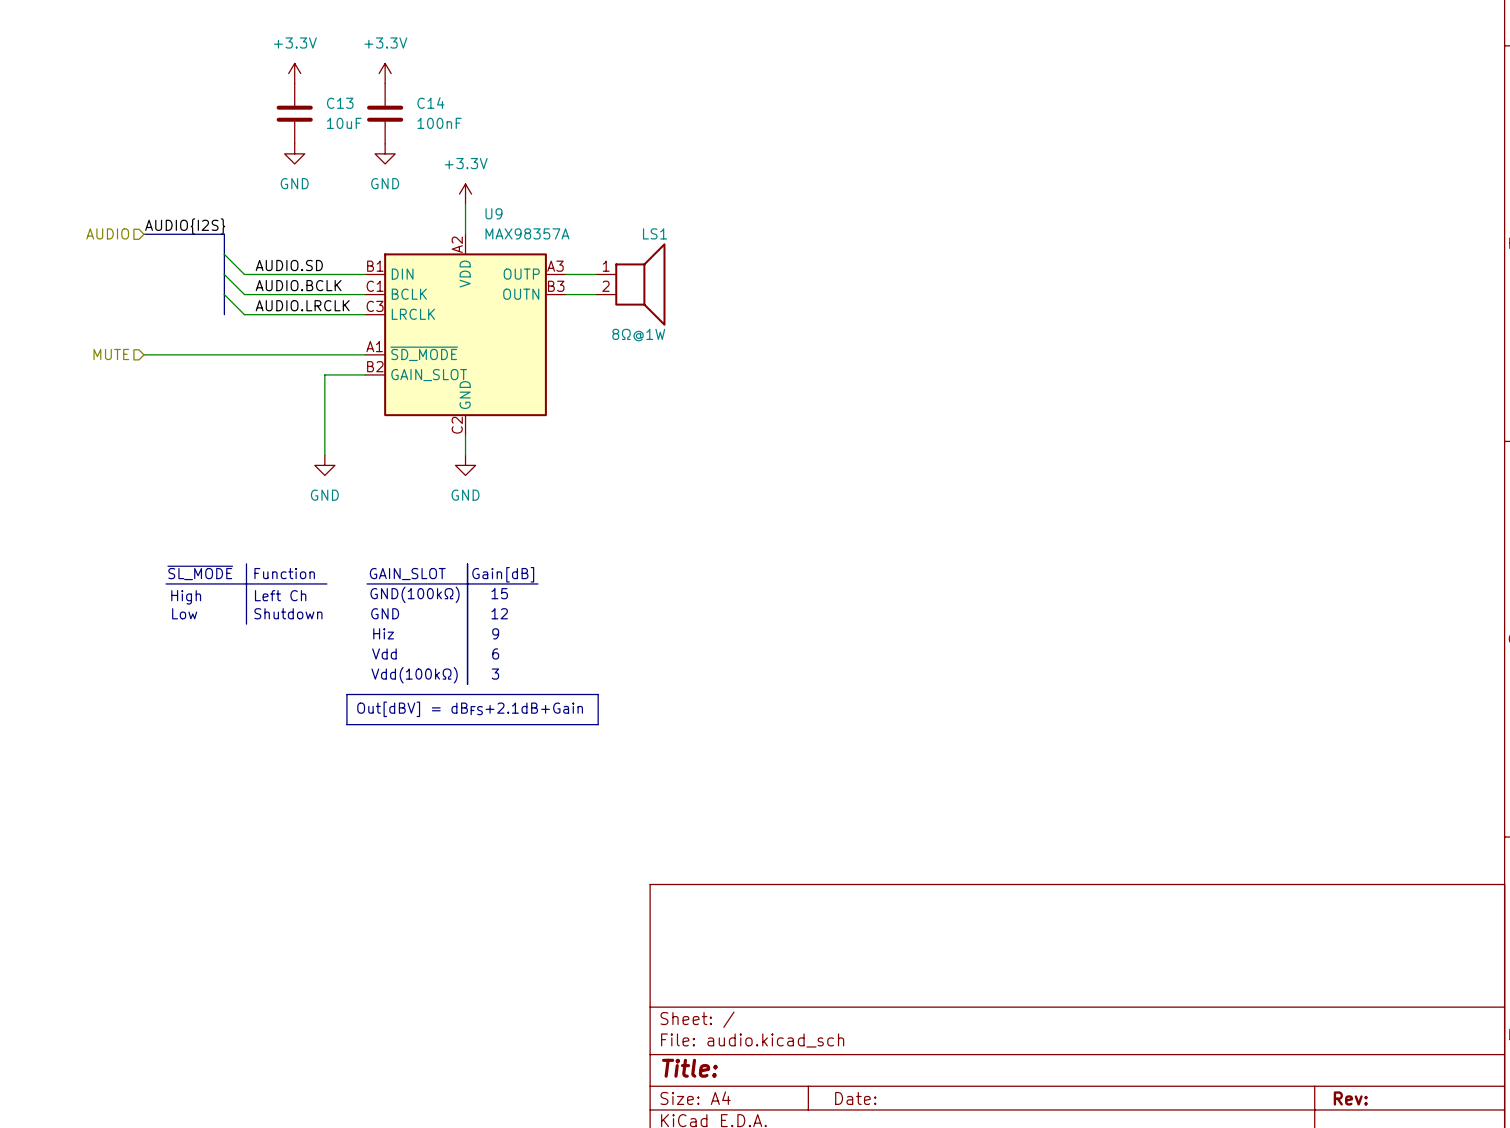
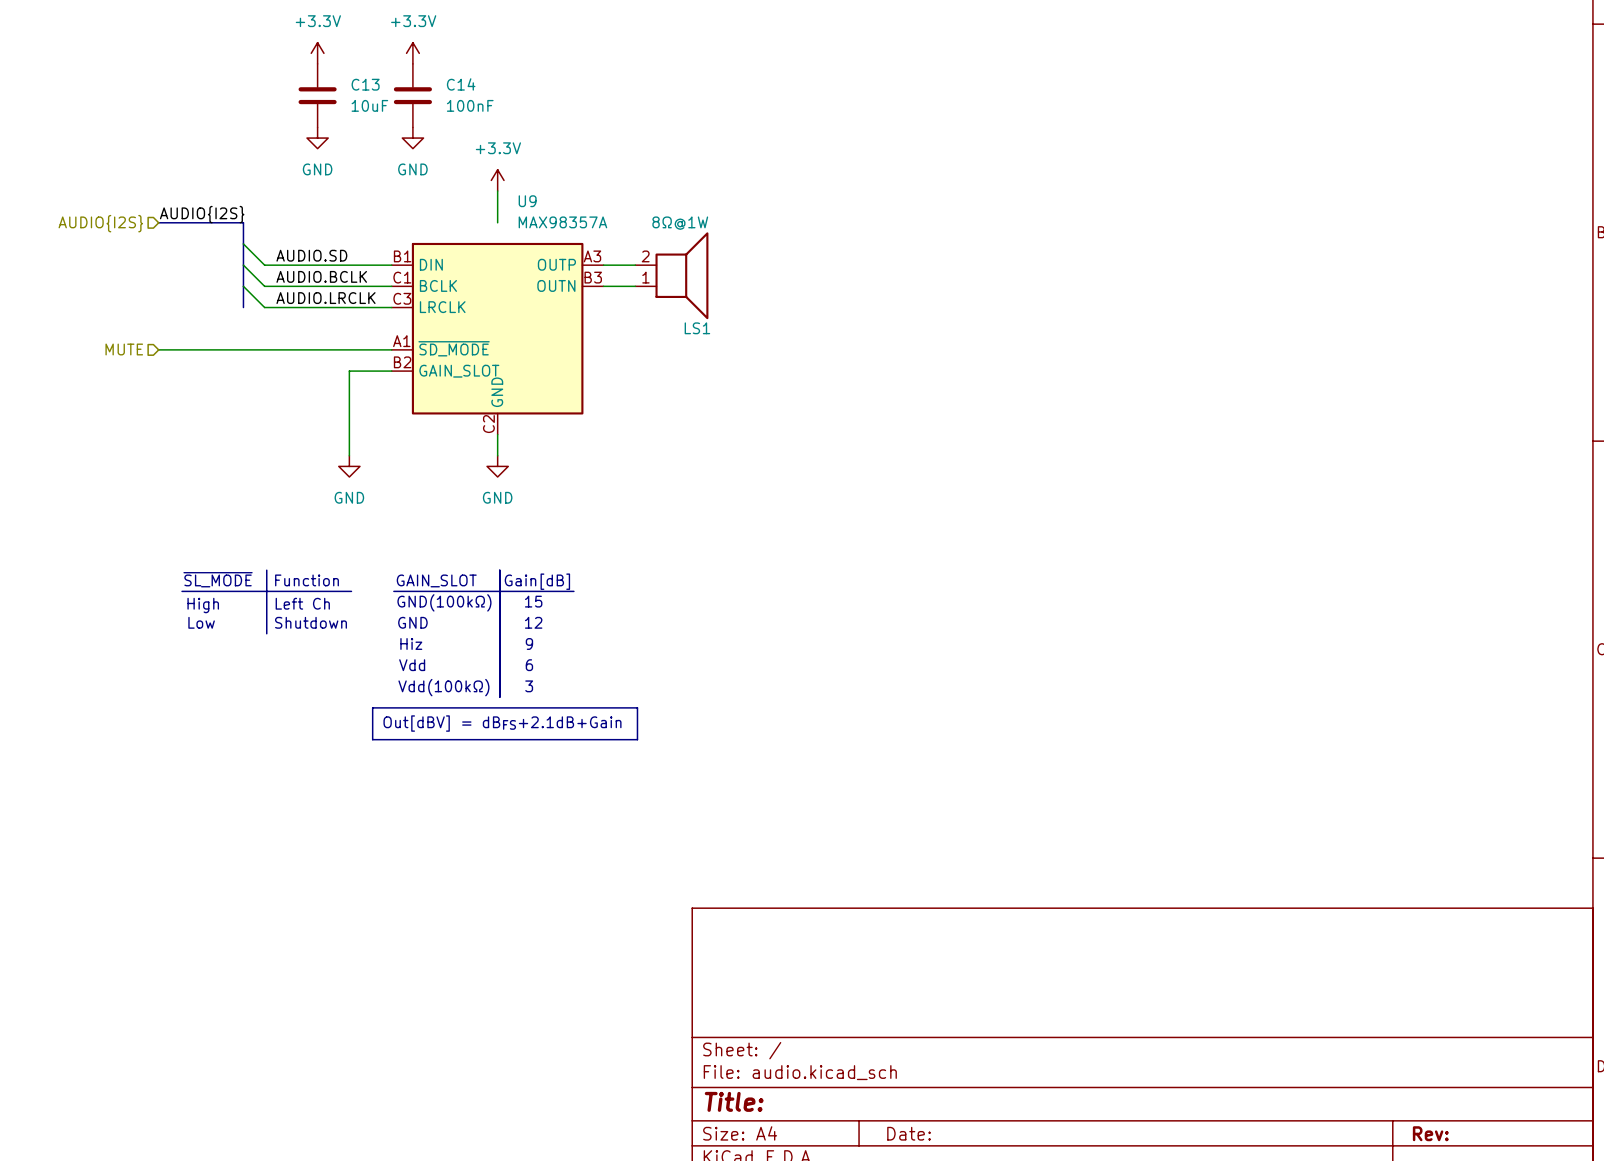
hierarchical label: AUDIO (107, 233) -> AUDIO{I2S} (100, 223)
U9 symbol: [365, 234, 567, 436] -> [391, 242, 604, 435]
LS1 flip: as is (640, 284) -> up-down (681, 275)

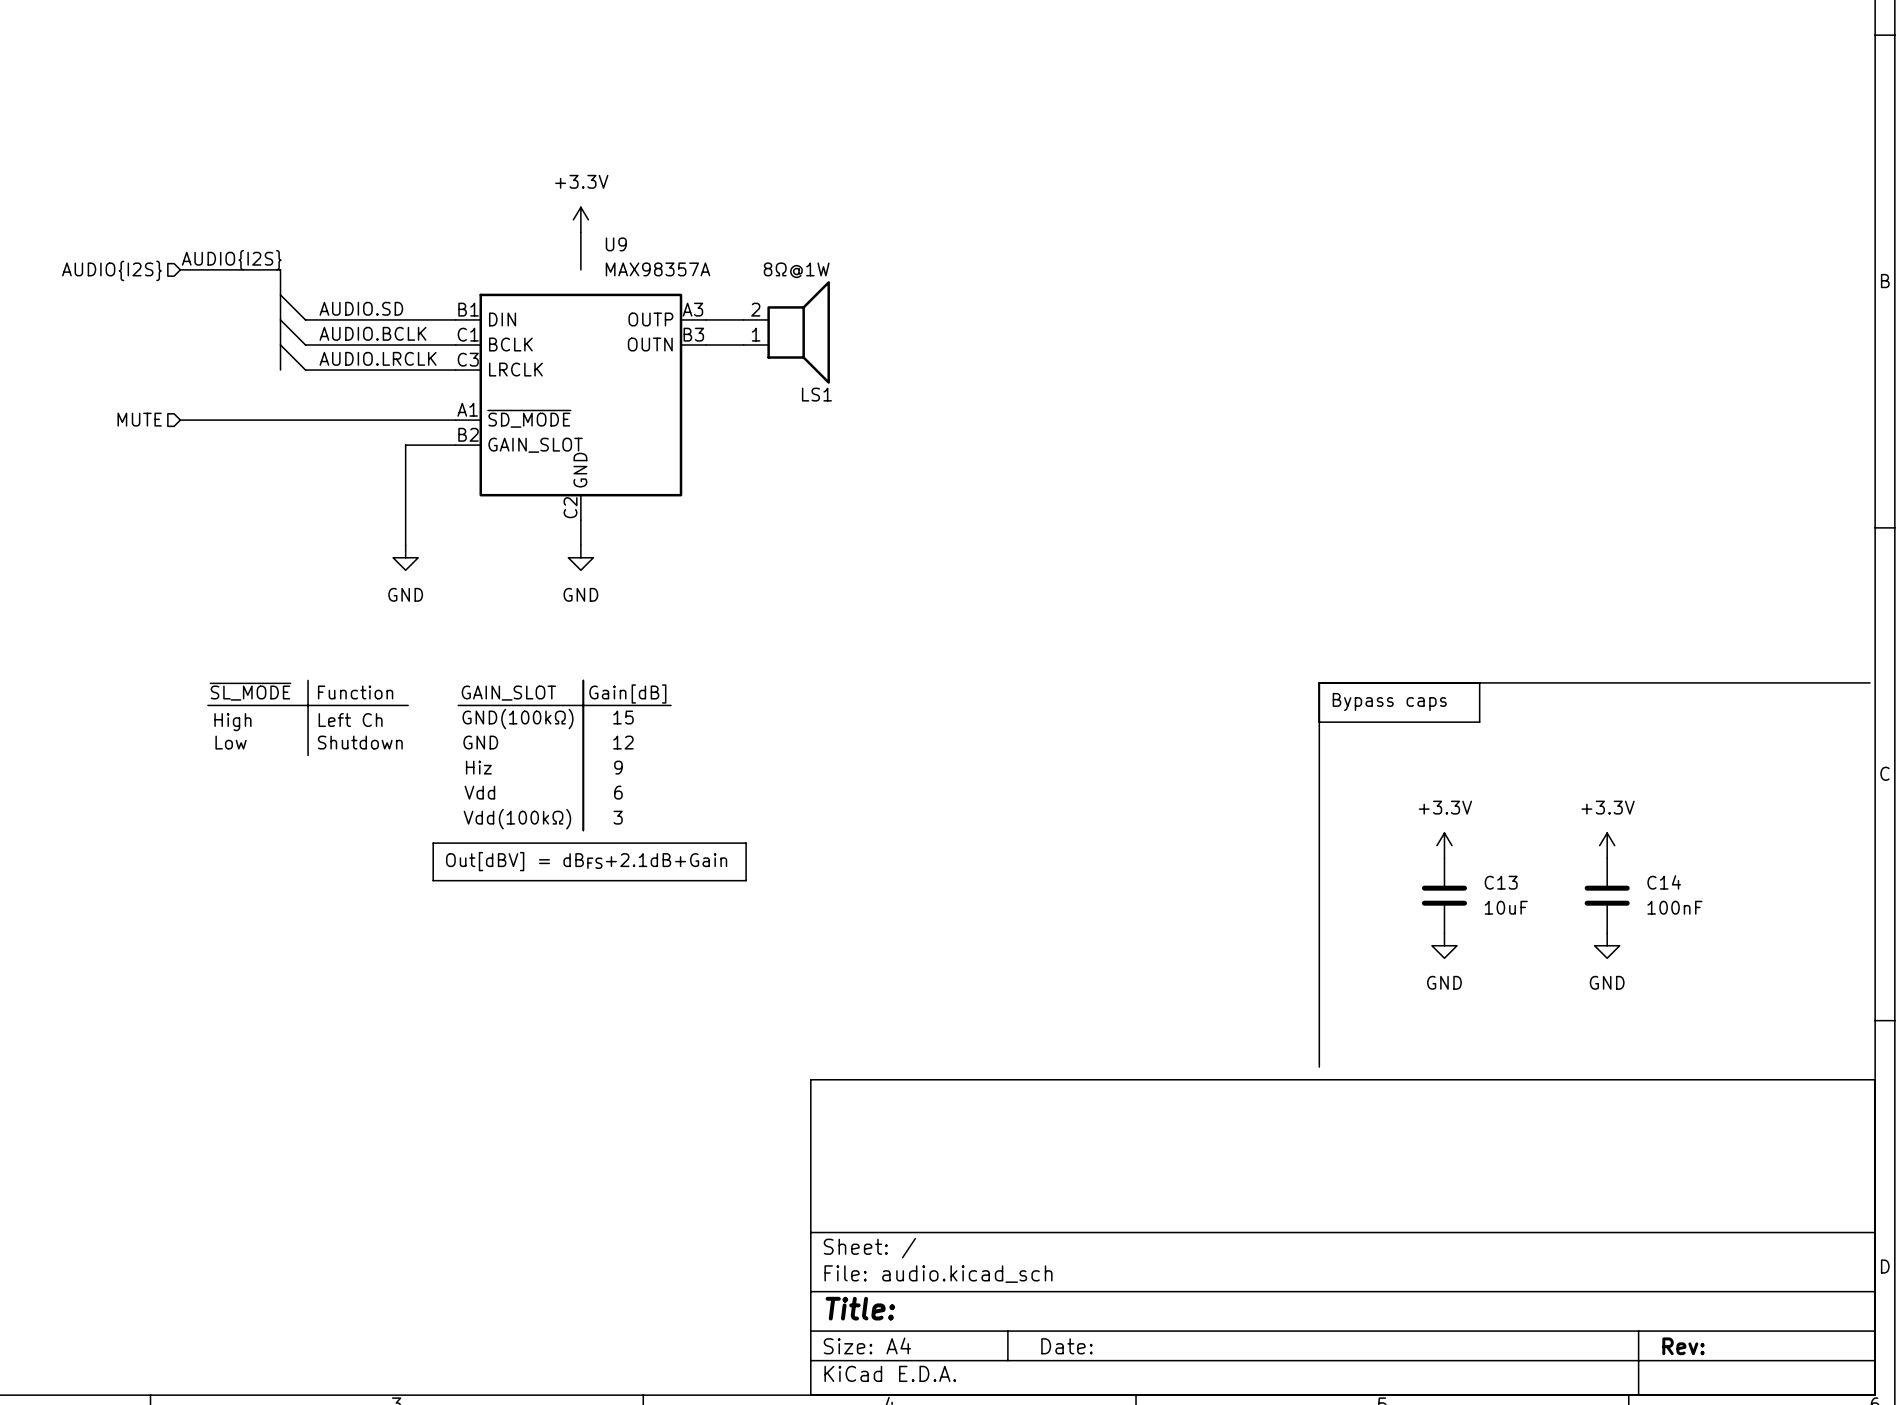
power symbol: +3.3V (317, 53) -> none
power symbol: +3.3V (412, 53) -> none
C13 position: (317, 95) -> (1444, 895)
C14 position: (412, 95) -> (1607, 895)
power symbol: GND (317, 138) -> none
power symbol: GND (412, 138) -> none
line: none -> (1479, 682) (1479, 722) (1319, 722)
line: none -> (1870, 682) (1319, 682) (1319, 1067)
text: none -> Bypass caps (1389, 701)
power symbol: none -> +3.3V (1444, 845)
power symbol: none -> +3.3V (1607, 845)
power symbol: none -> GND (1444, 945)
power symbol: none -> GND (1607, 945)

